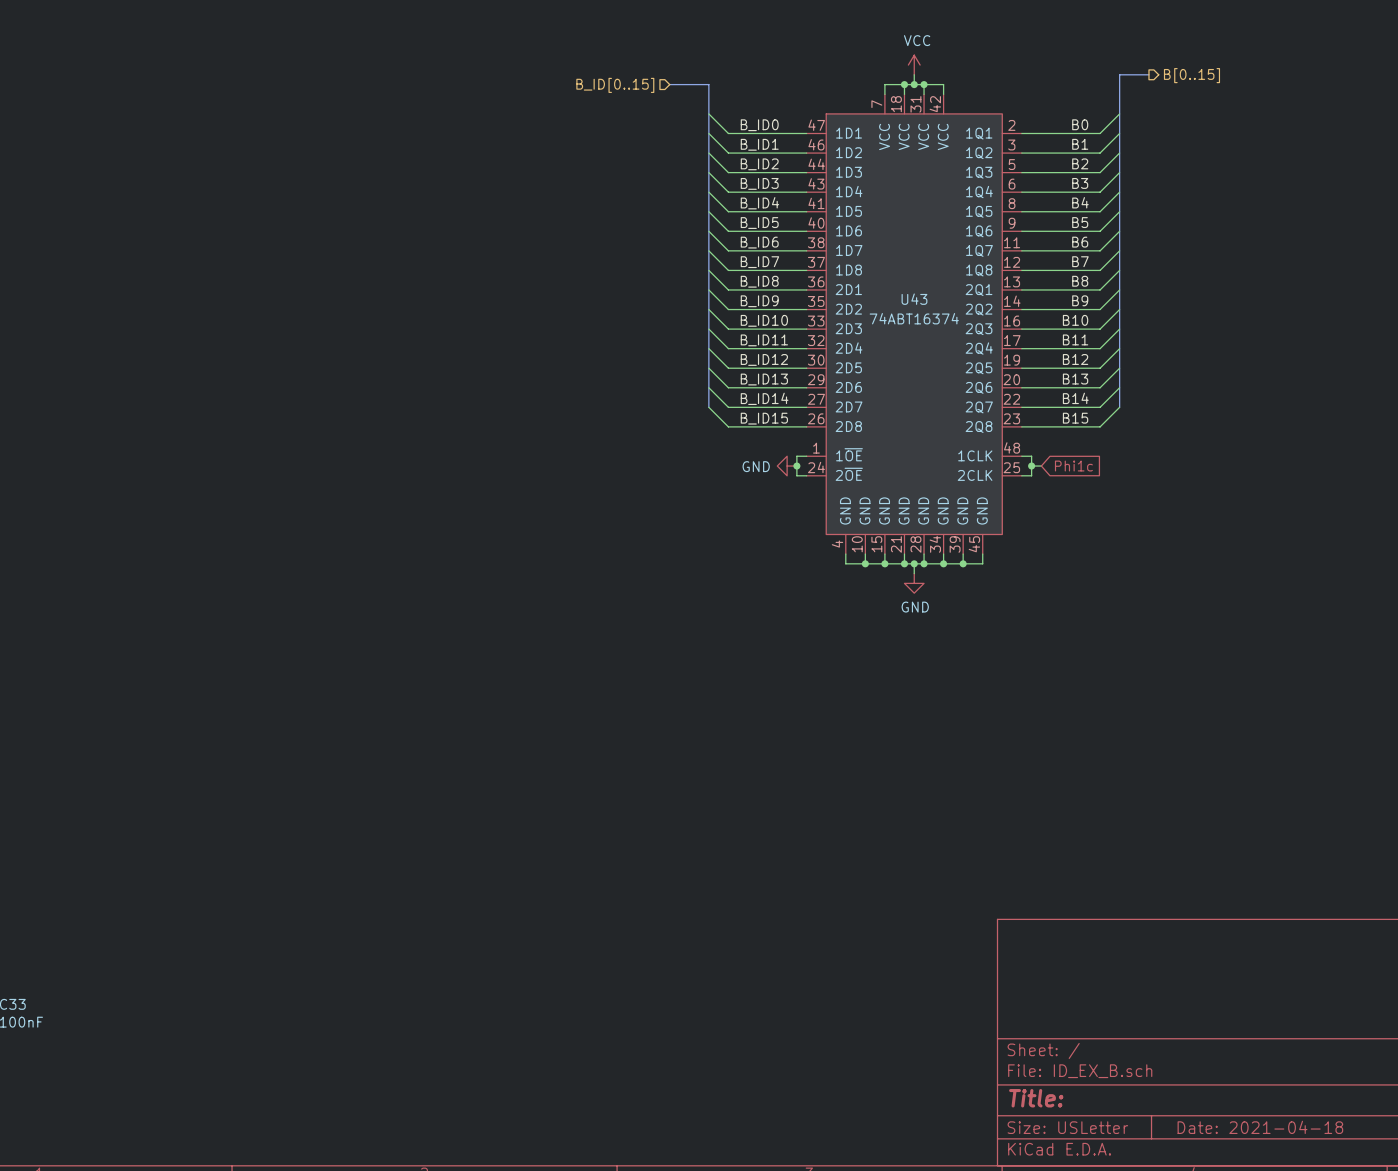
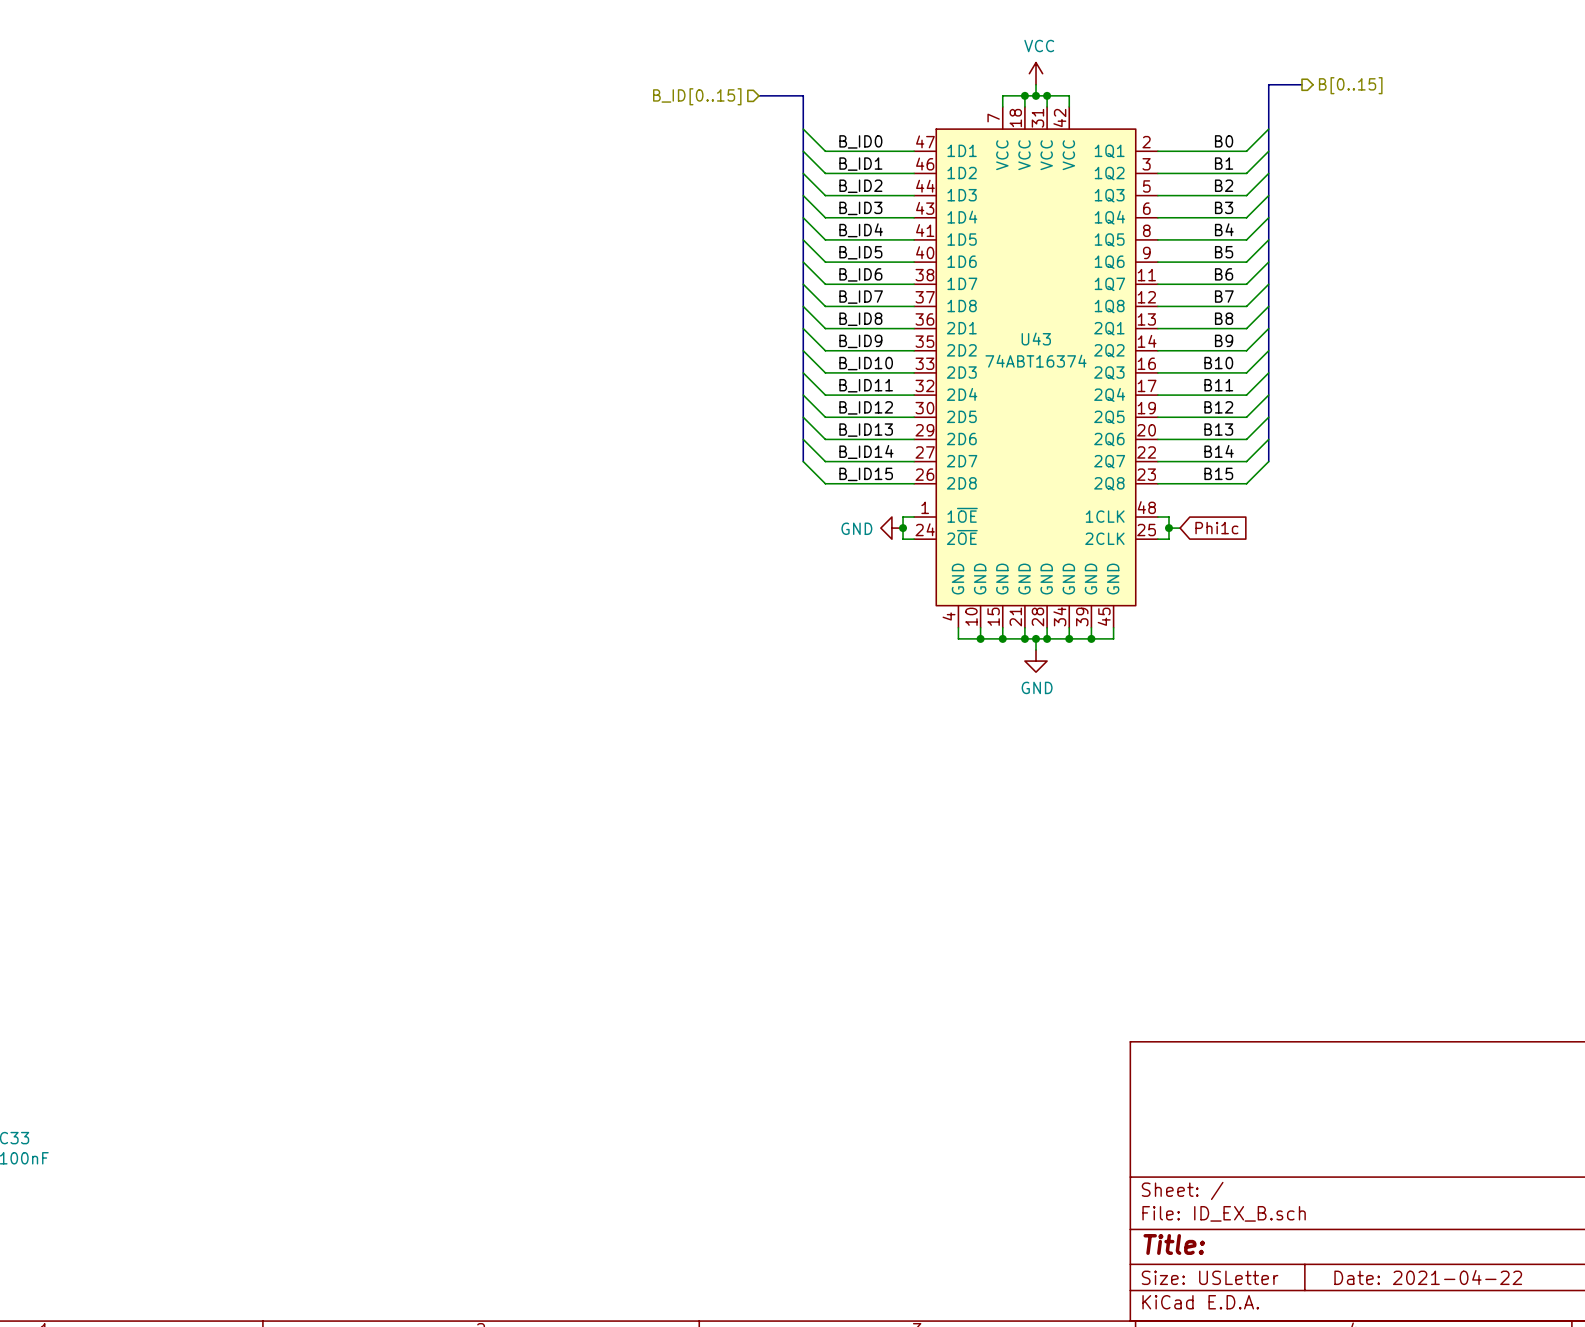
title block: Date: 2021-04-18 (1260, 1127) -> Date: 2021-04-22 (1428, 1277)

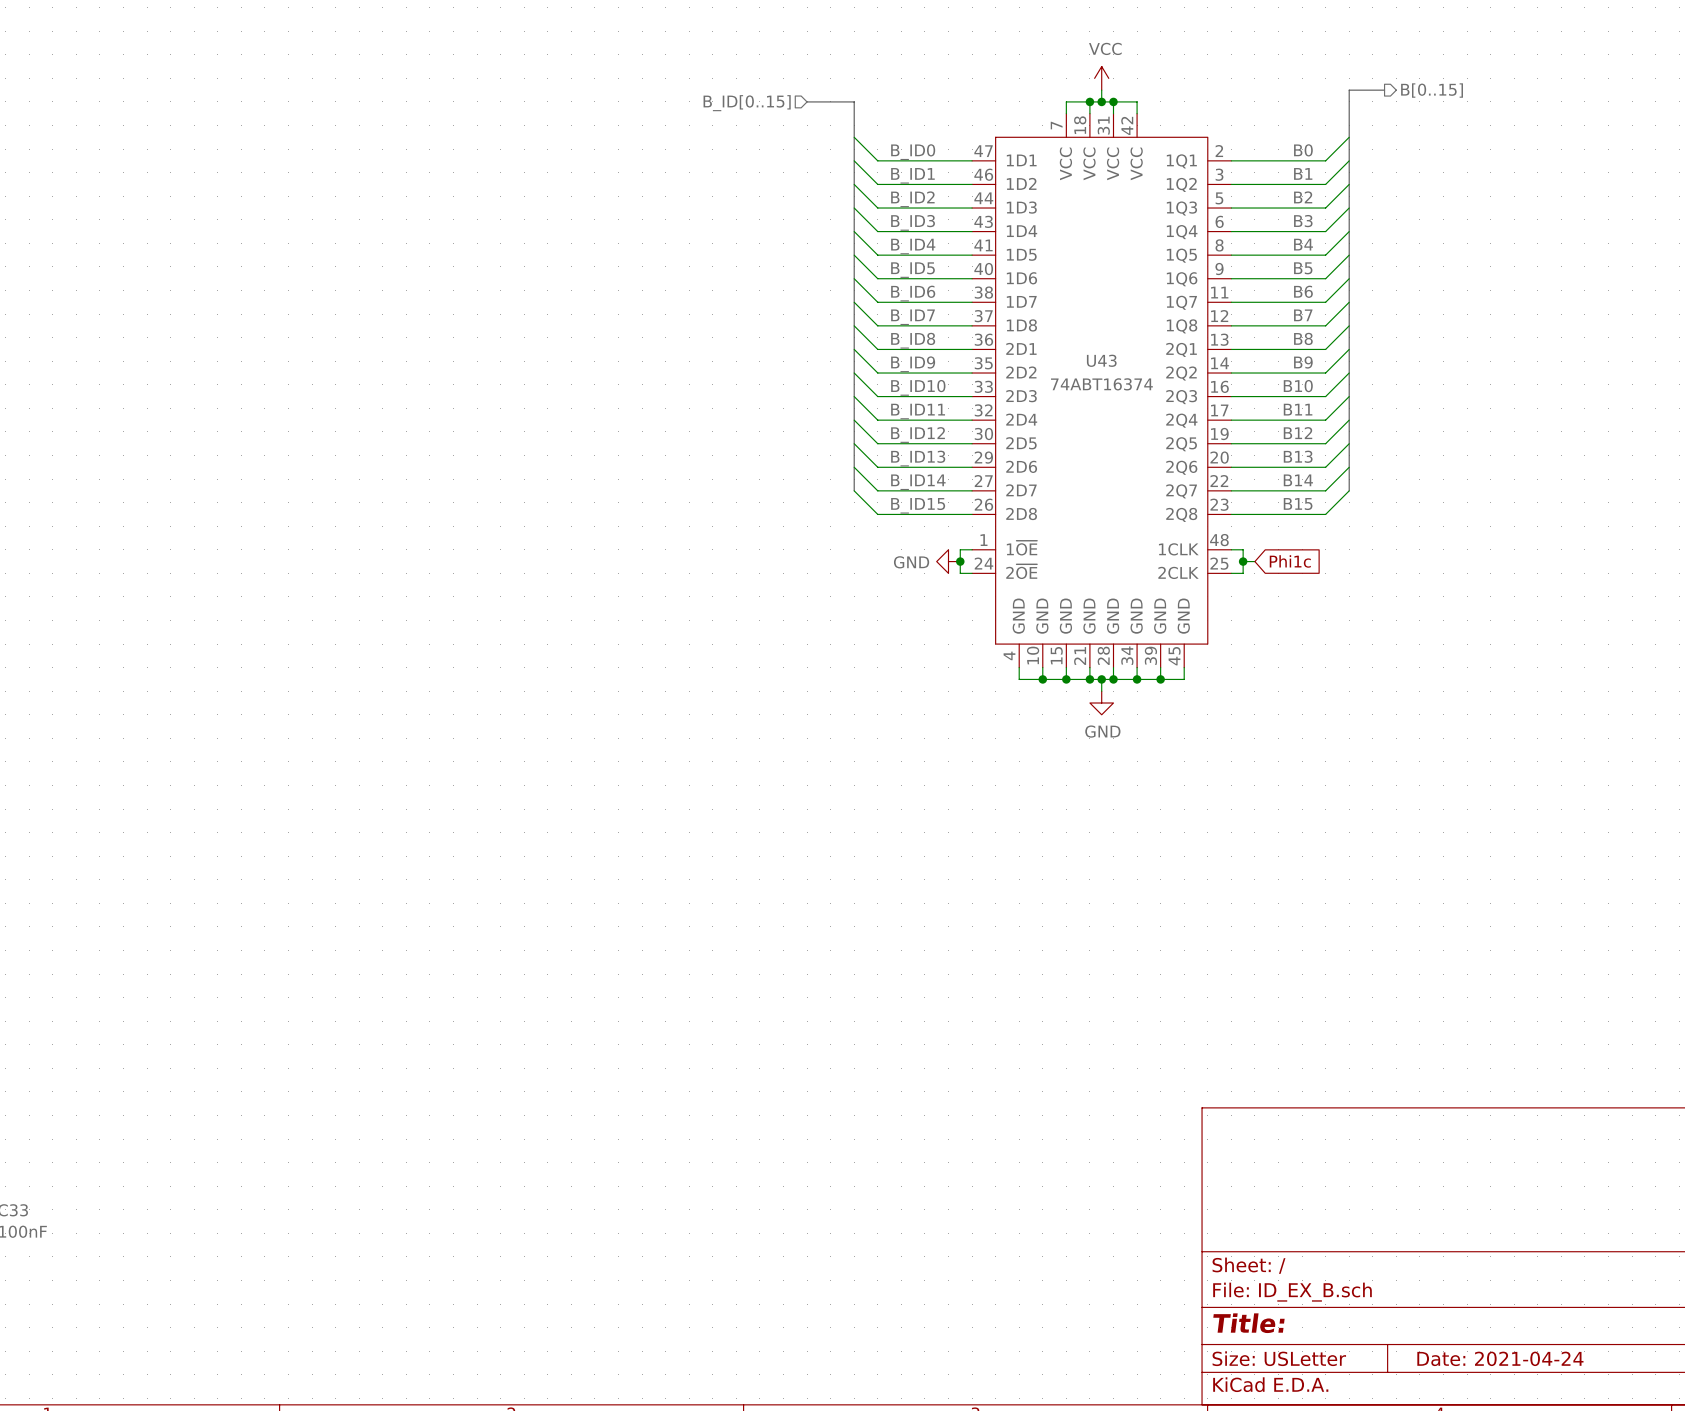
title block: Date: 2021-04-22 (1428, 1277) -> Date: 2021-04-24 (1500, 1358)

